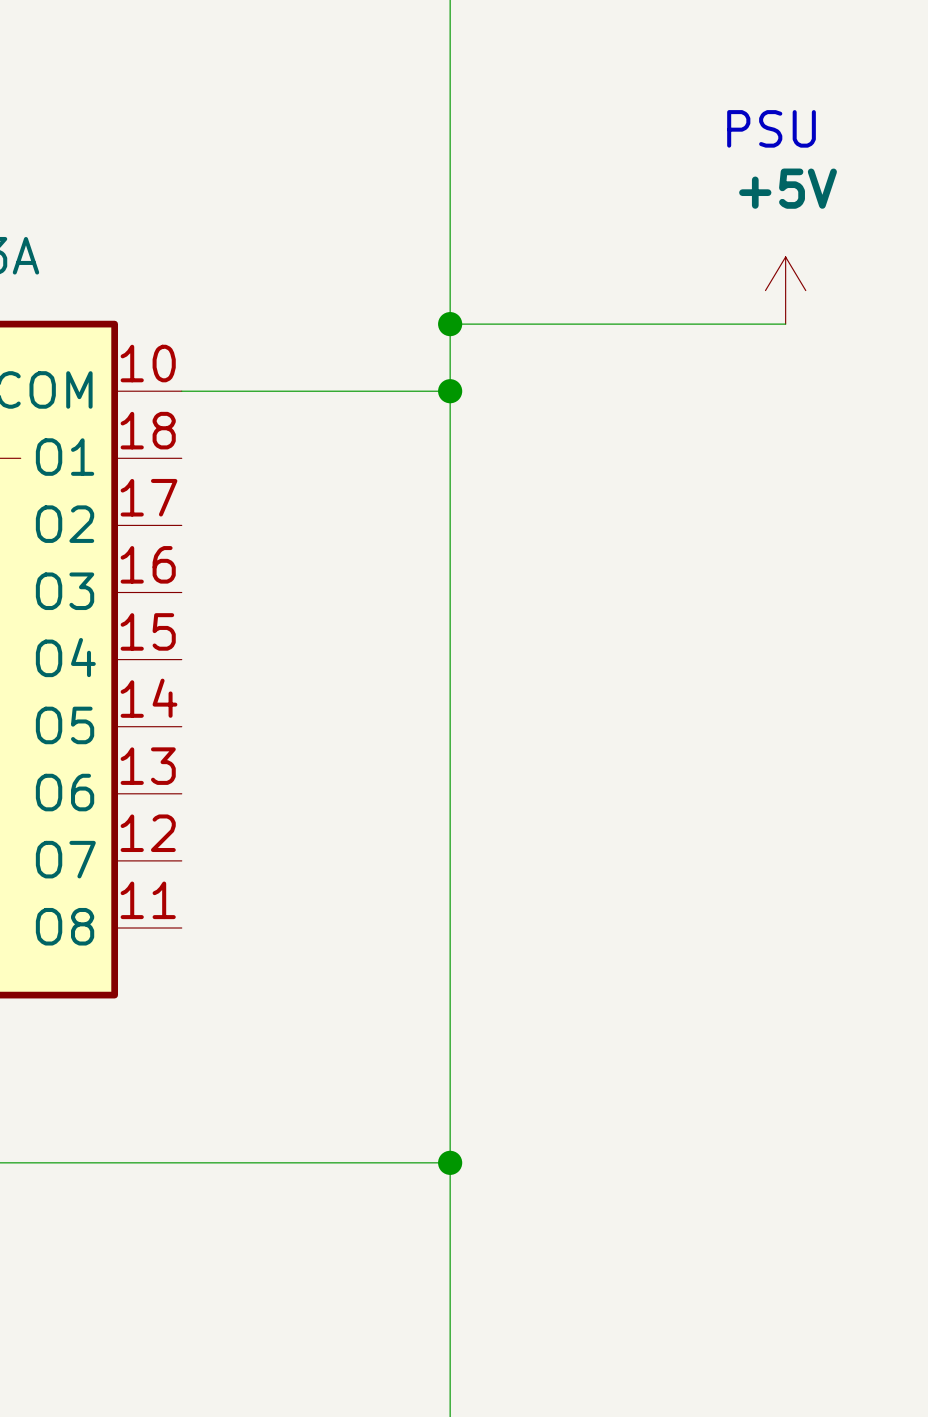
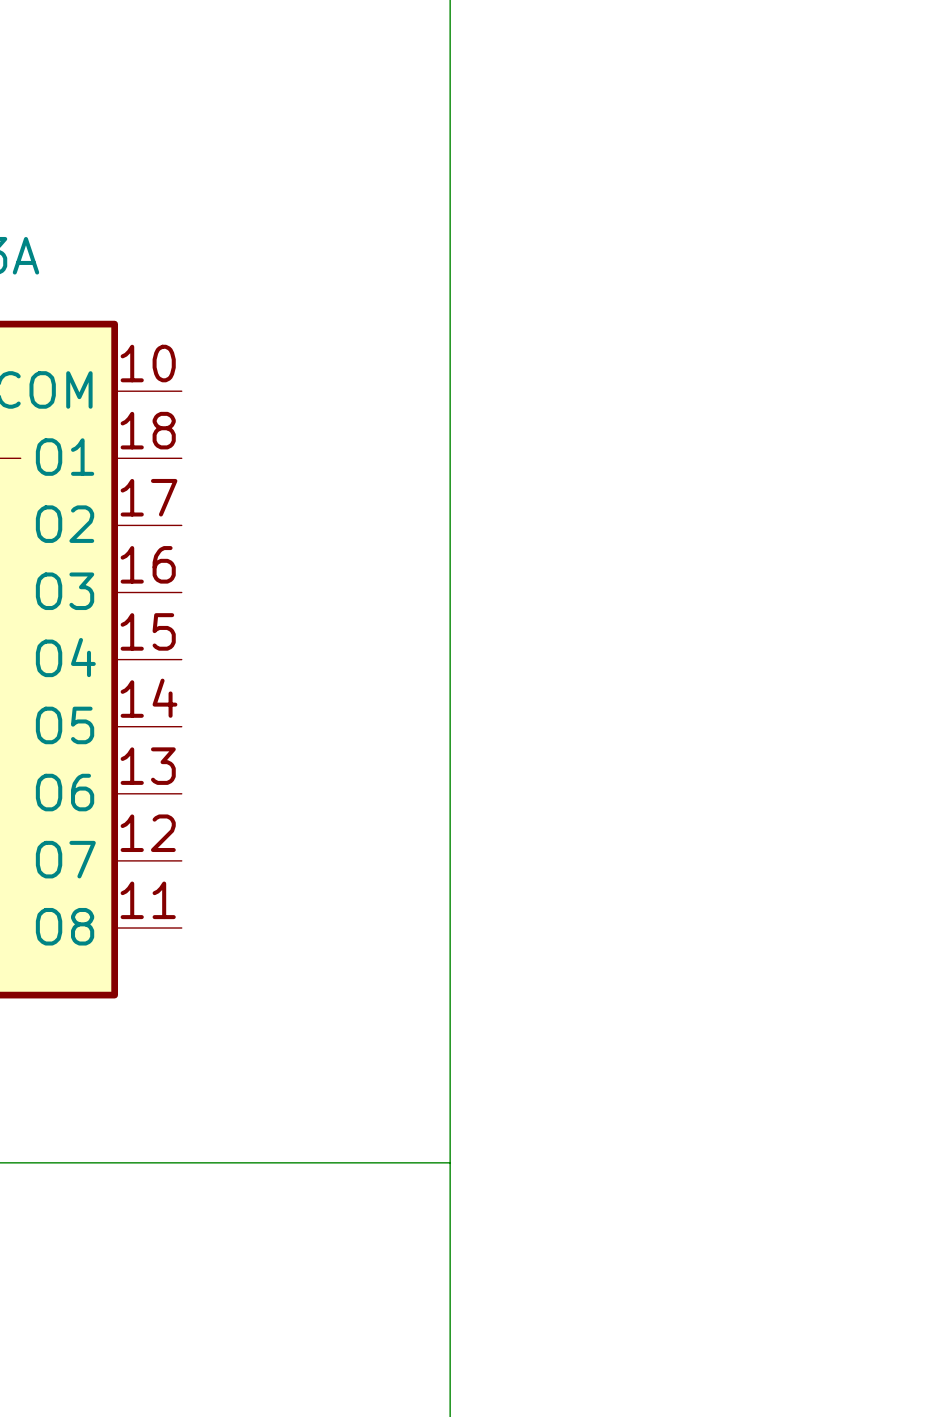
text: PSU (771, 128) -> none
power symbol: +5V (785, 290) -> none
wire: (450, 324) (785, 324) -> none
junction: (450, 324) -> none
wire: (181, 391) (450, 391) -> none
junction: (450, 391) -> none
junction: (450, 1162) -> none

